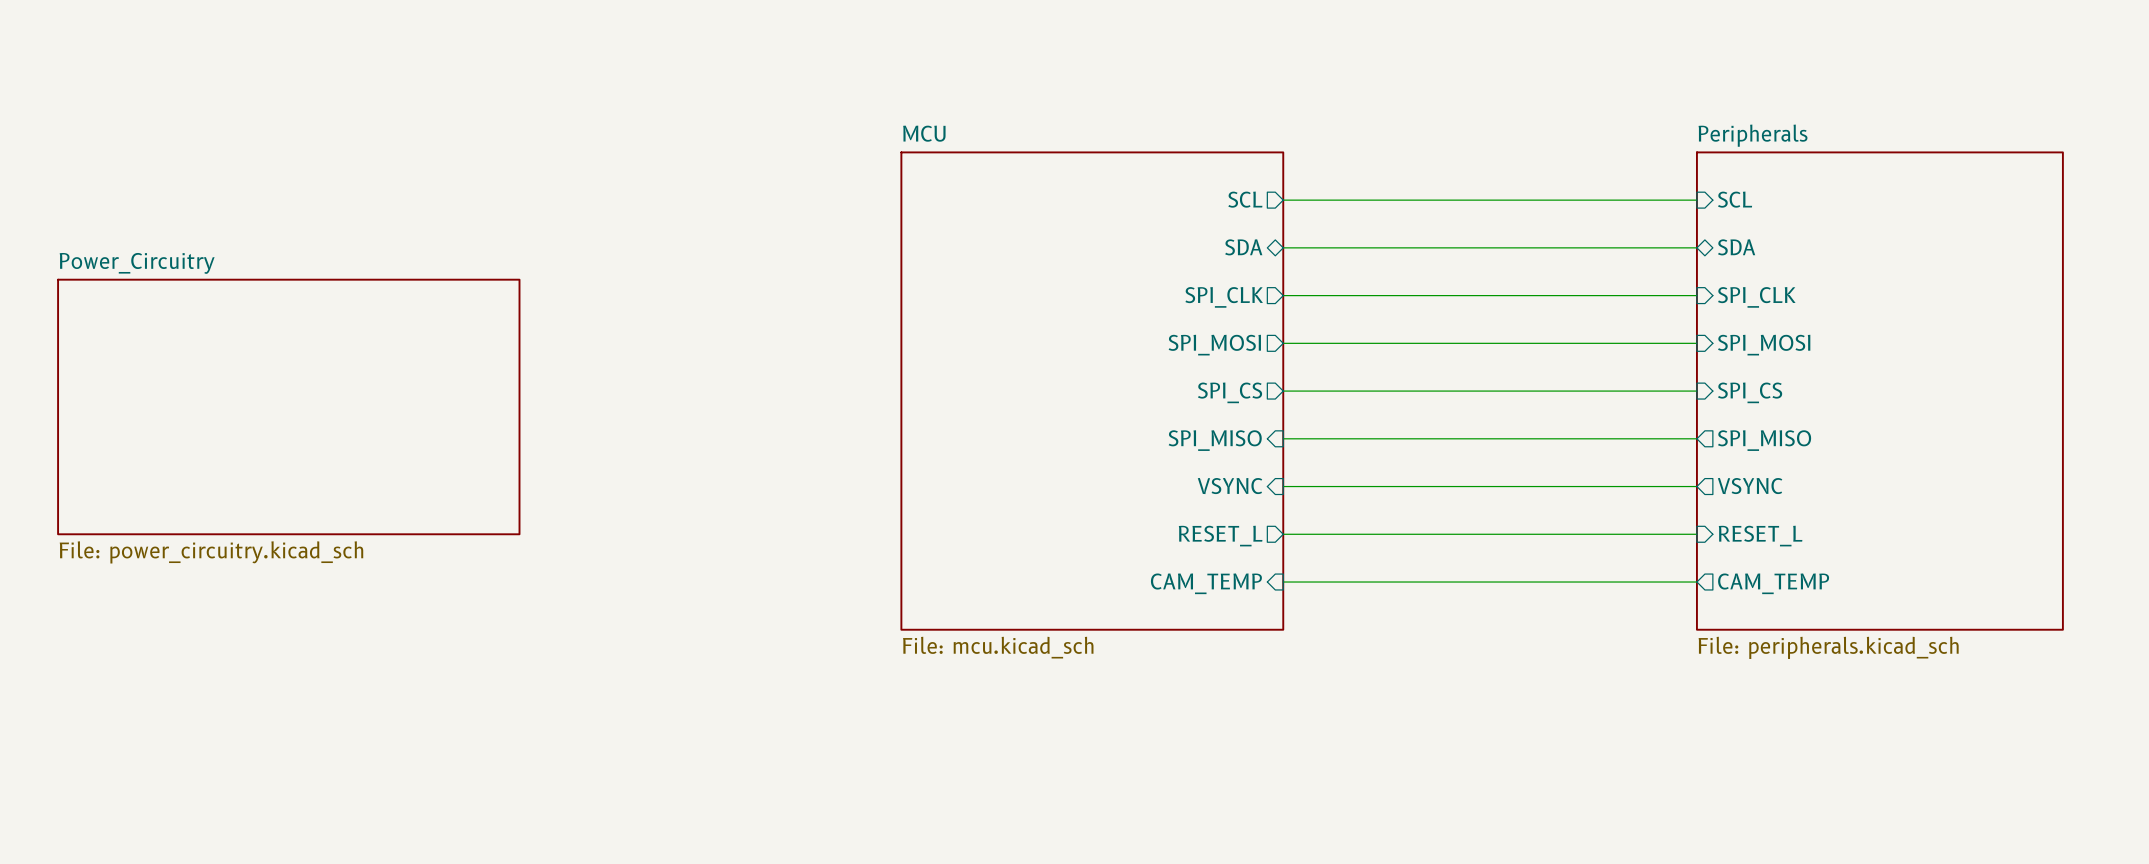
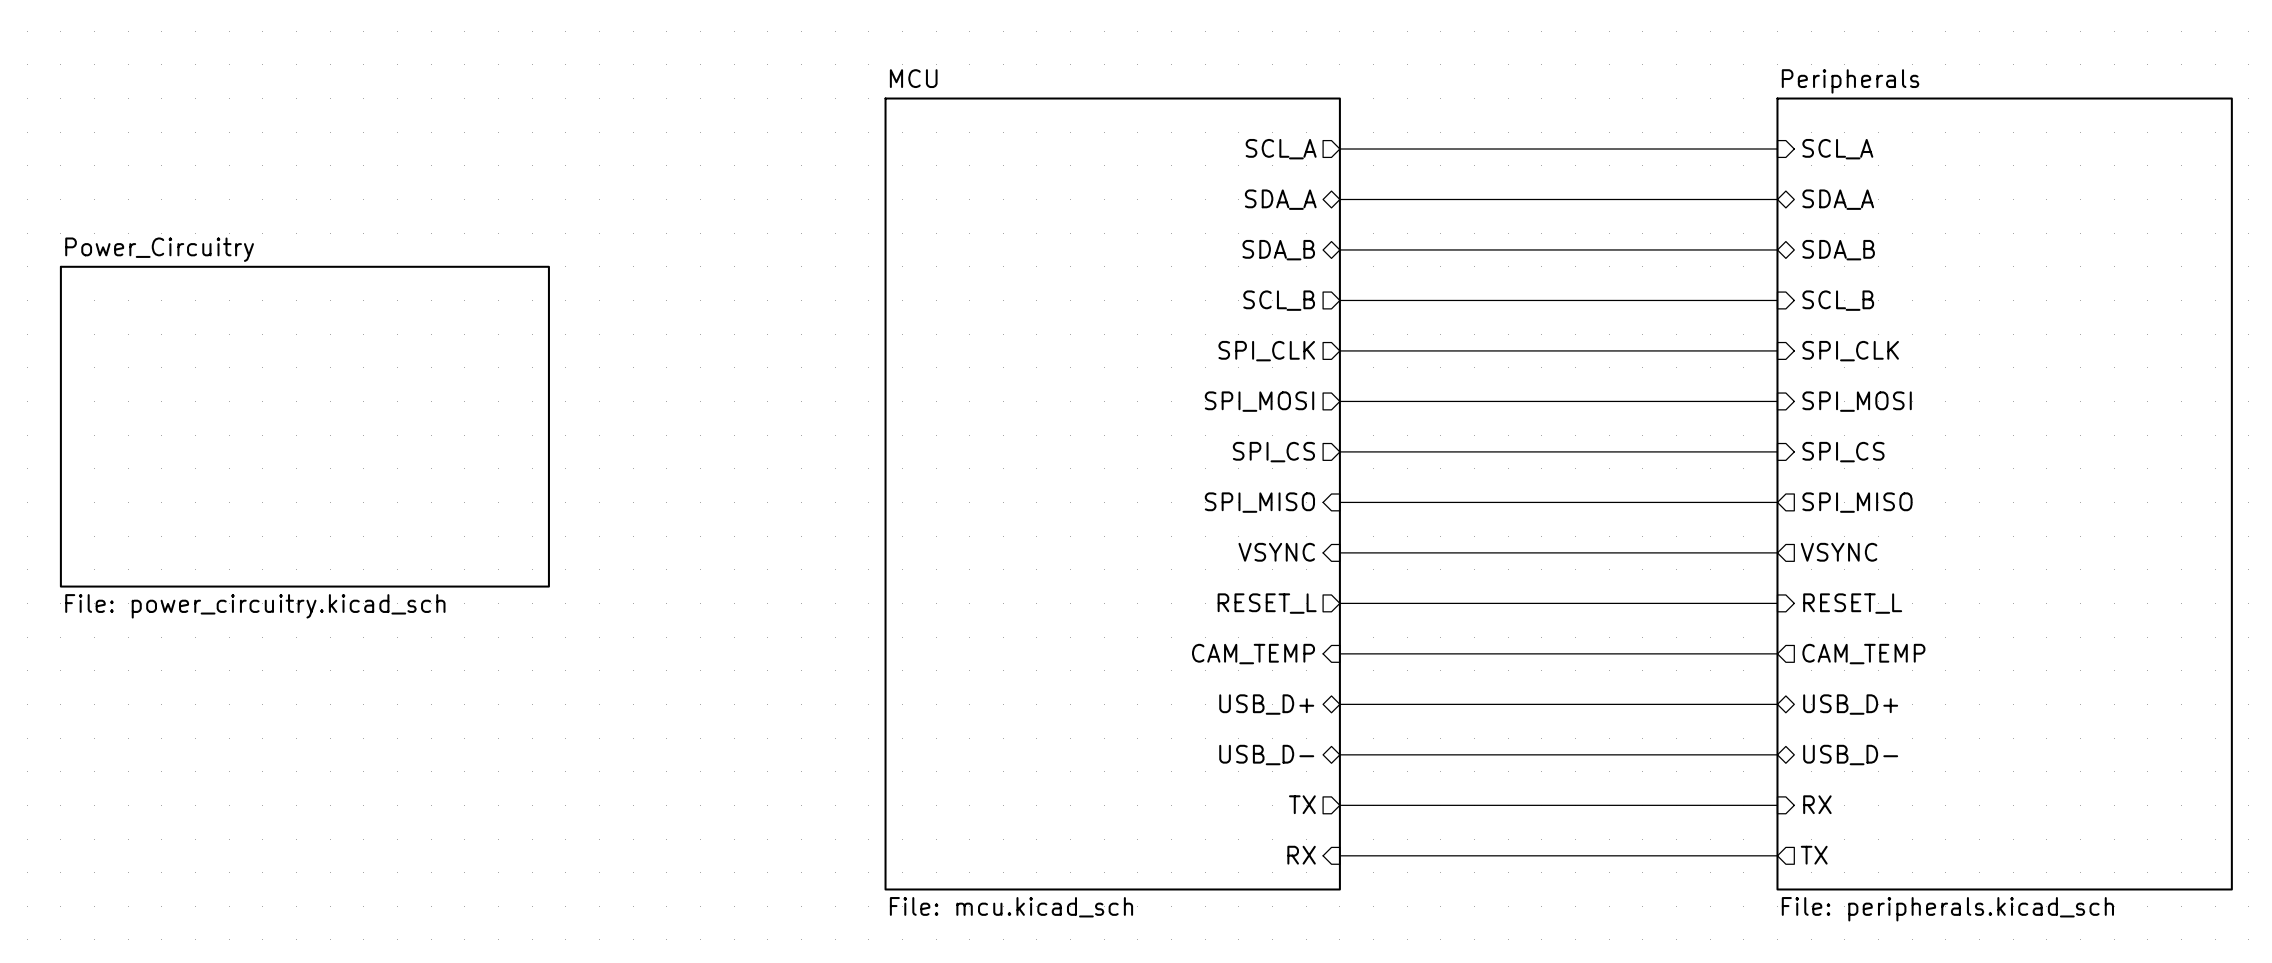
wire: none -> (1339, 149) (1777, 149)
sheet pin: none -> SCL_A (1281, 149)
sheet pin: none -> SCL_A (1837, 149)
wire: none -> (1339, 199) (1777, 199)
sheet pin: none -> SDA_A (1280, 199)
sheet pin: none -> SDA_A (1838, 199)
sheet pin shape: output (1245, 199) -> bidirectional (1278, 250)
sheet pin: SCL (1245, 199) -> SDA_B (1278, 250)
sheet pin shape: input (1735, 199) -> bidirectional (1838, 250)
sheet pin: SCL (1735, 199) -> SDA_B (1838, 250)
sheet pin shape: bidirectional (1243, 247) -> output (1279, 300)
sheet pin: SDA (1243, 247) -> SCL_B (1279, 300)
sheet pin shape: bidirectional (1736, 247) -> input (1838, 300)
sheet pin: SDA (1736, 247) -> SCL_B (1838, 300)
sheet Power_Circuitry: none -> File: power_circuitry.kicad_sch (304, 426)
sheet MCU: File: mcu.kicad_sch (1092, 391) -> none
sheet Peripherals: File: peripherals.kicad_sch (1879, 391) -> none
sheet Power_Circuitry: File: power_circuitry.kicad_sch (288, 406) -> none
sheet MCU: none -> File: mcu.kicad_sch (1112, 494)
sheet Peripherals: none -> File: peripherals.kicad_sch (2004, 494)
wire: none -> (1339, 704) (1777, 704)
sheet pin: none -> USB_D+ (1266, 704)
sheet pin: none -> USB_D+ (1850, 704)
wire: none -> (1339, 754) (1777, 754)
sheet pin: none -> USB_D- (1266, 755)
sheet pin: none -> USB_D- (1850, 755)
sheet pin: none -> TX (1302, 804)
sheet pin: none -> RX (1817, 804)
wire: none -> (1339, 805) (1777, 805)
sheet pin: none -> RX (1301, 855)
wire: none -> (1339, 855) (1777, 855)
sheet pin: none -> TX (1814, 855)

